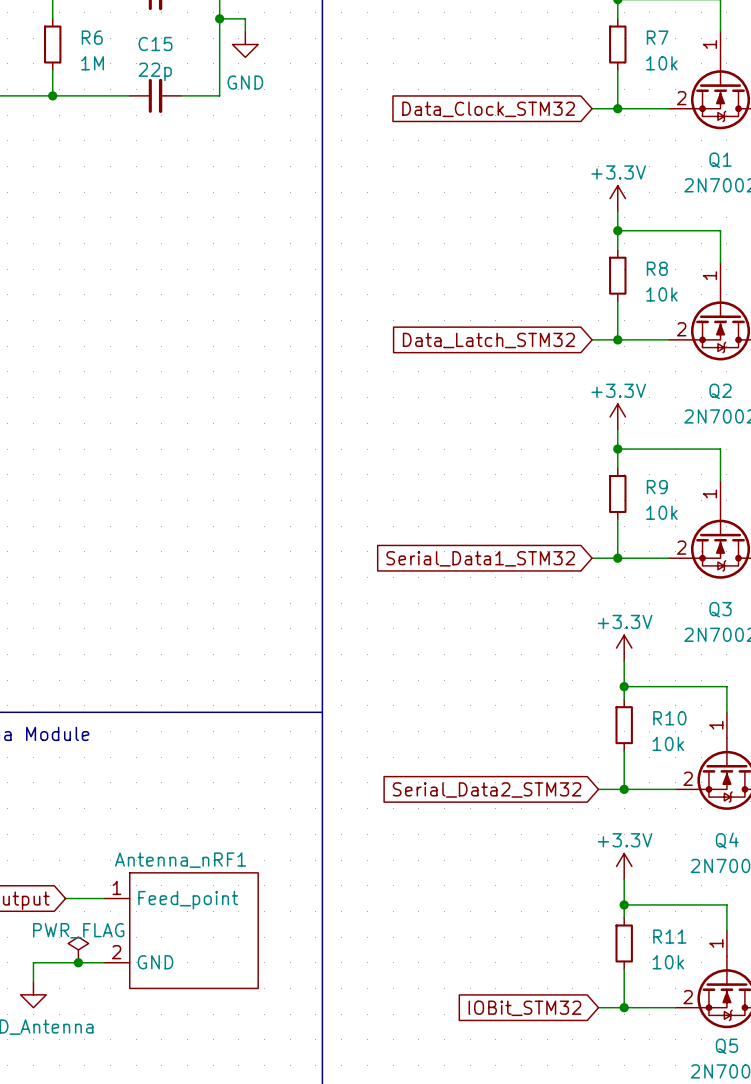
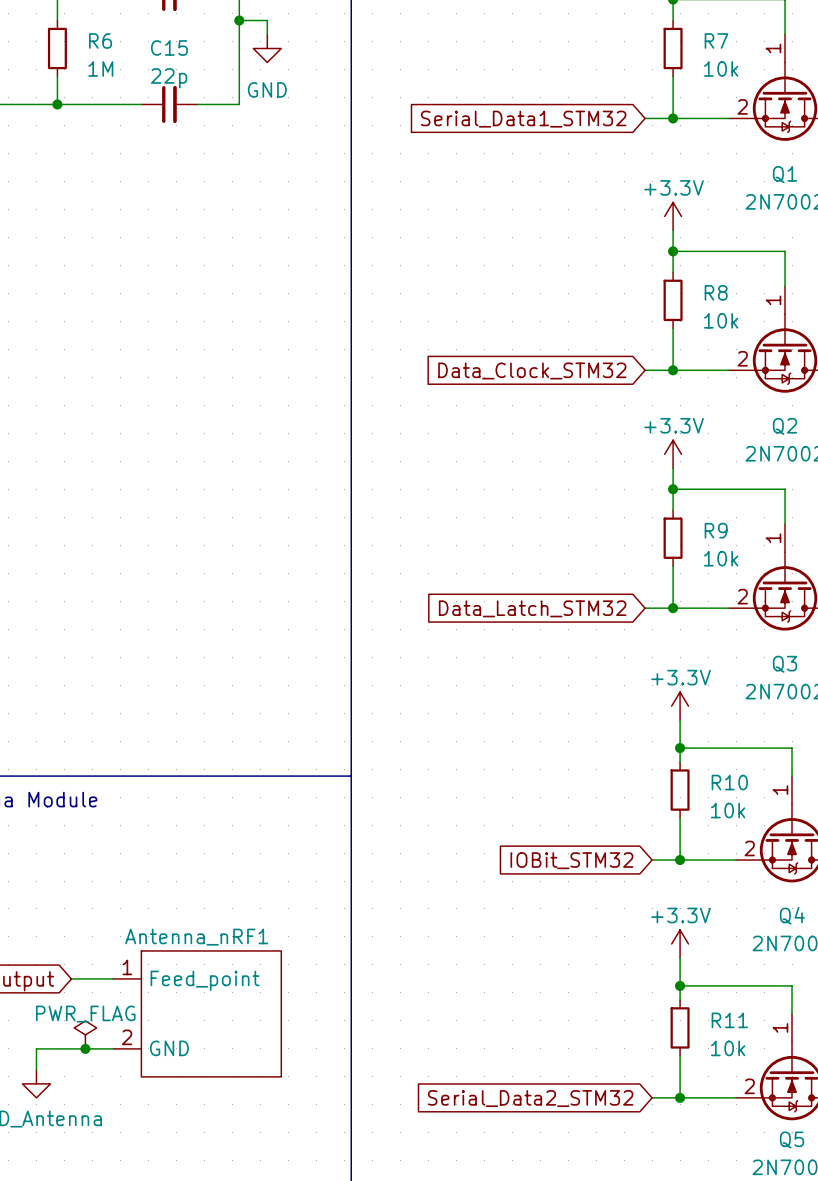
global label: Data_Clock_STM32 (488, 109) -> Serial_Data1_STM32 (523, 119)
global label: Data_Latch_STM32 (488, 340) -> Data_Clock_STM32 (532, 370)
global label: Serial_Data1_STM32 (480, 558) -> Data_Latch_STM32 (532, 608)
global label: Serial_Data2_STM32 (487, 789) -> IOBit_STM32 (571, 860)
global label: IOBit_STM32 (524, 1008) -> Serial_Data2_STM32 (530, 1098)

